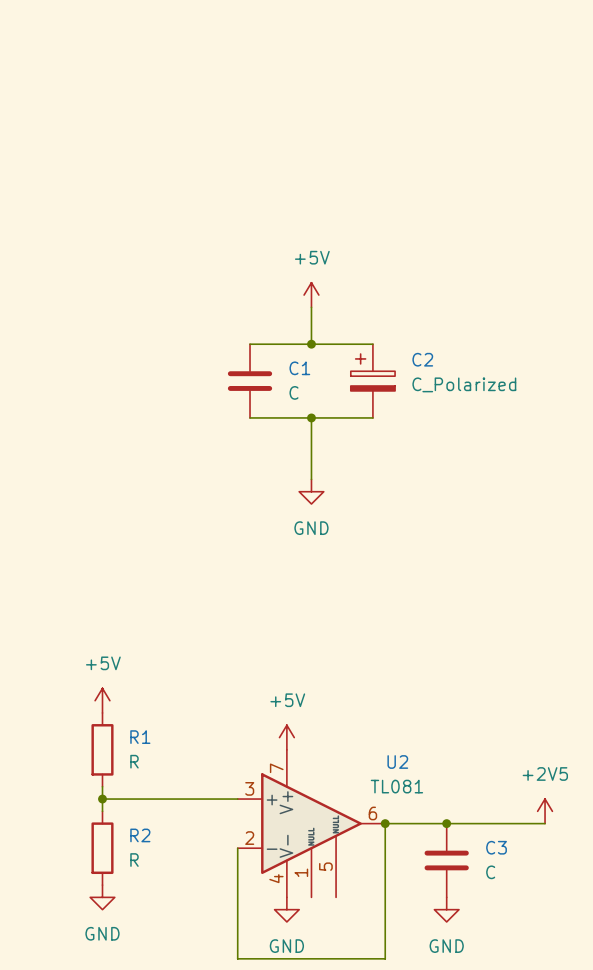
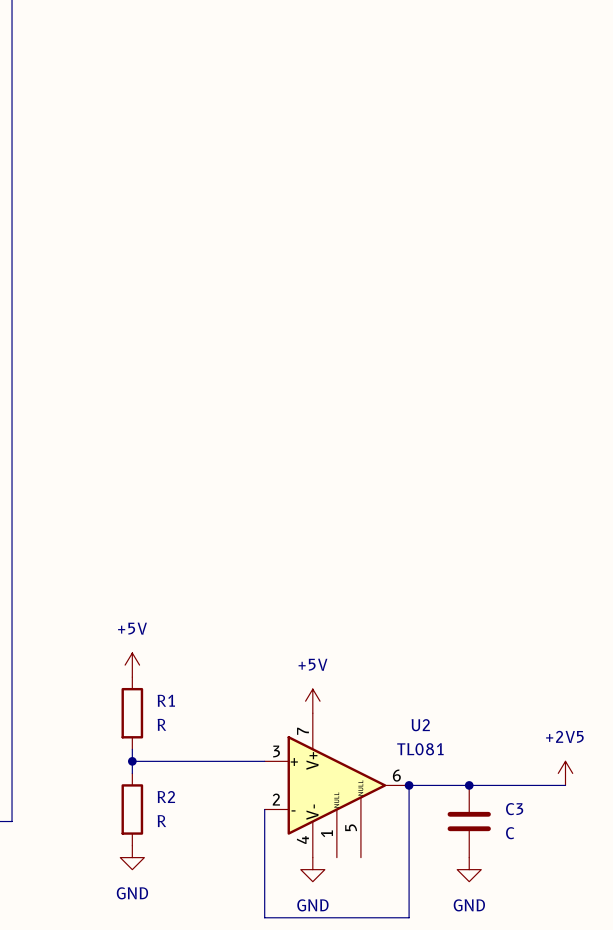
power symbol: +5V (311, 295) -> none
wire: (311, 307) (311, 344) -> none
wire: (250, 344) (372, 344) -> none
junction: (311, 344) -> none
C1: C (250, 381) -> none
C2: C_Polarized (372, 381) -> none
wire: (250, 417) (372, 417) -> none
wire: (311, 417) (311, 479) -> none
junction: (311, 417) -> none
power symbol: GND (311, 491) -> none

